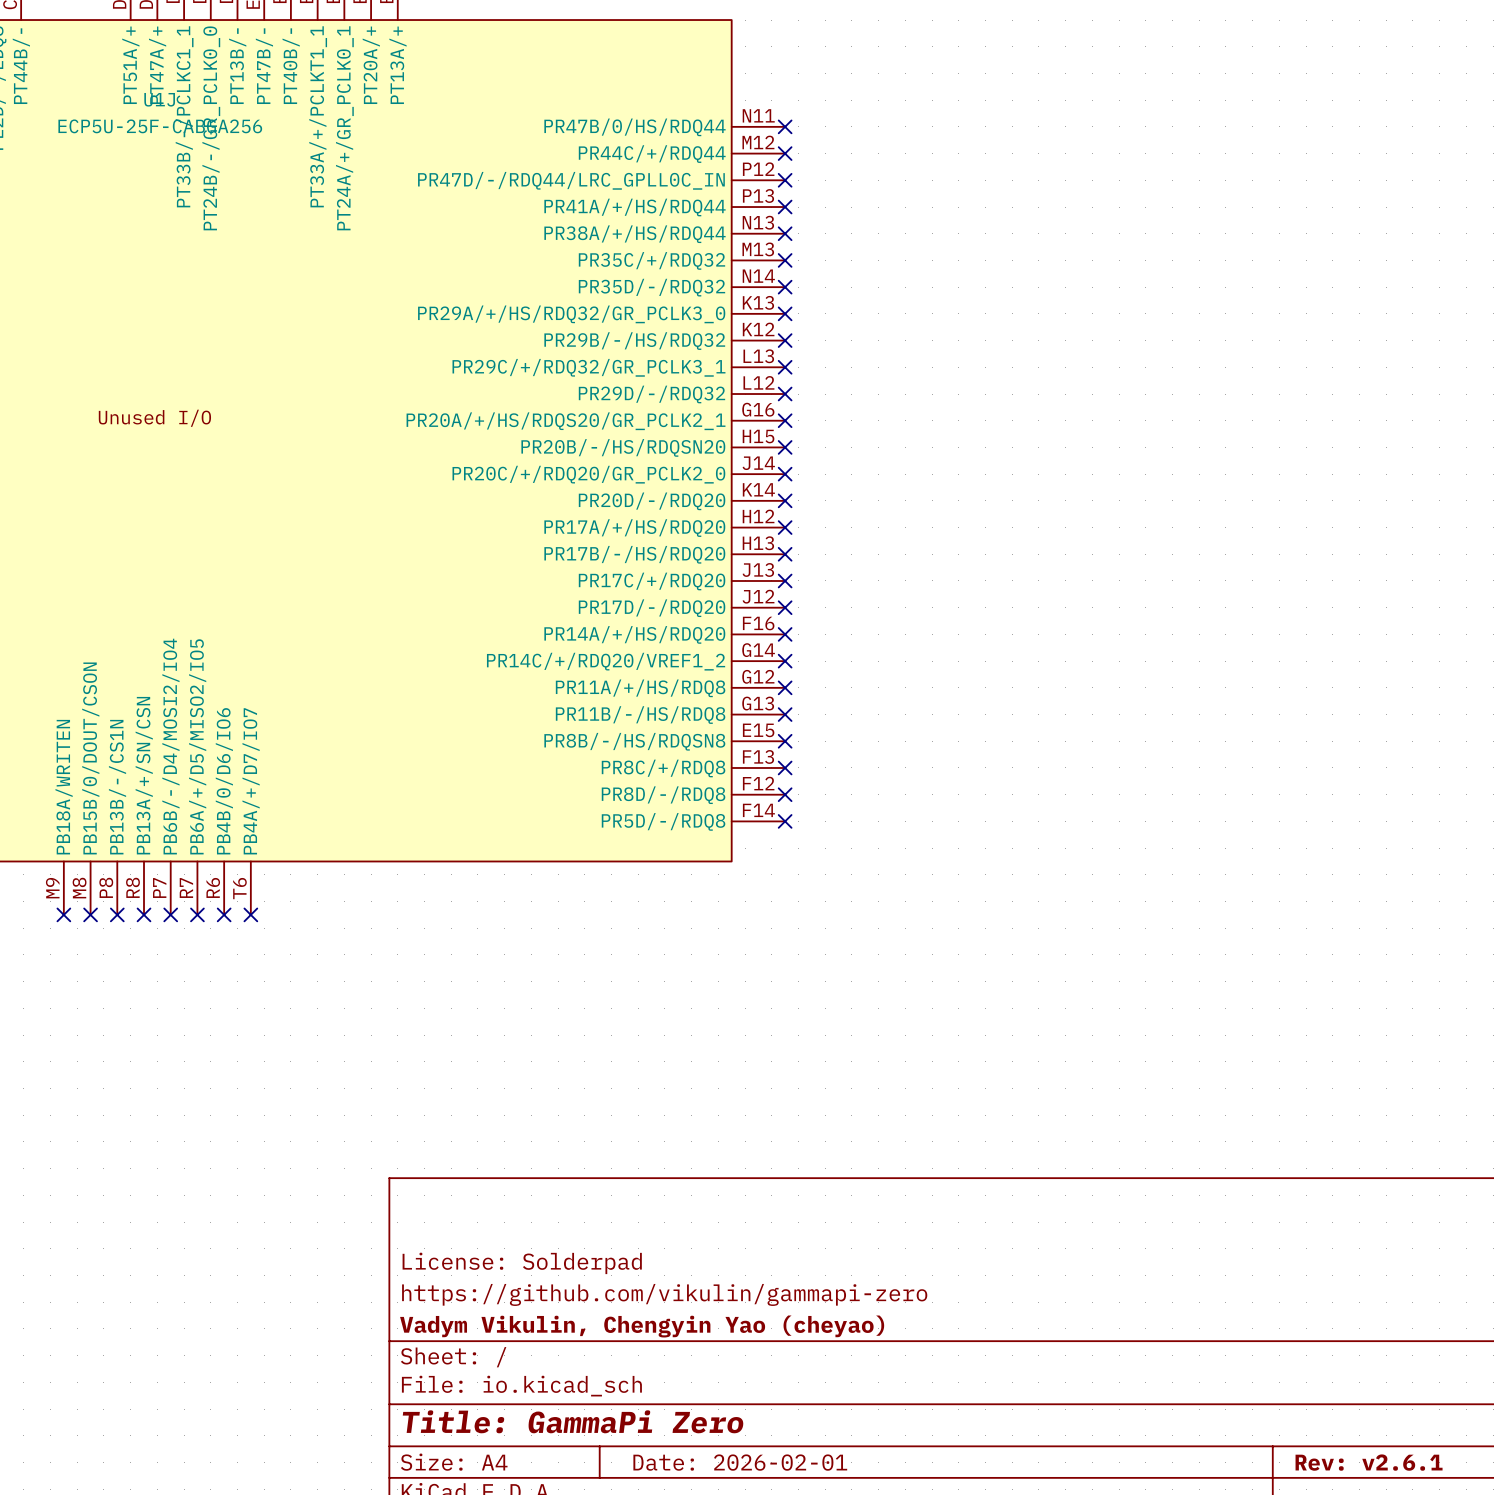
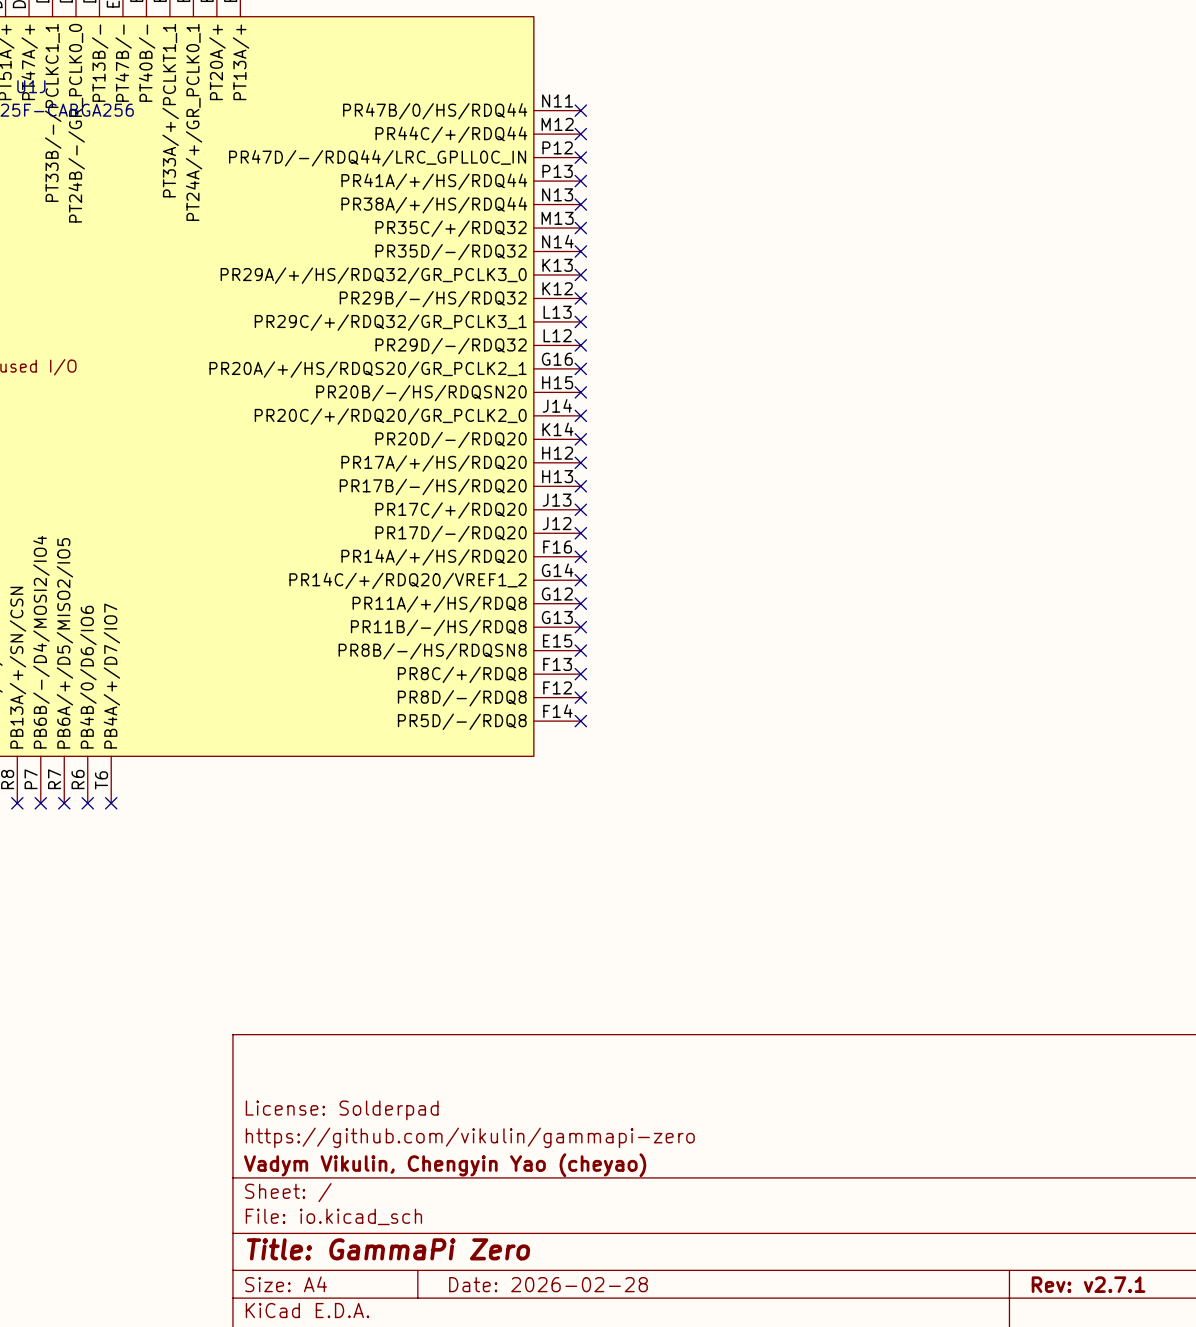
title block: Date: 2026-02-01 (740, 1462) -> Date: 2026-02-28 (548, 1284)
title block: Rev: v2.6.1 (1369, 1462) -> Rev: v2.7.1 (1088, 1284)

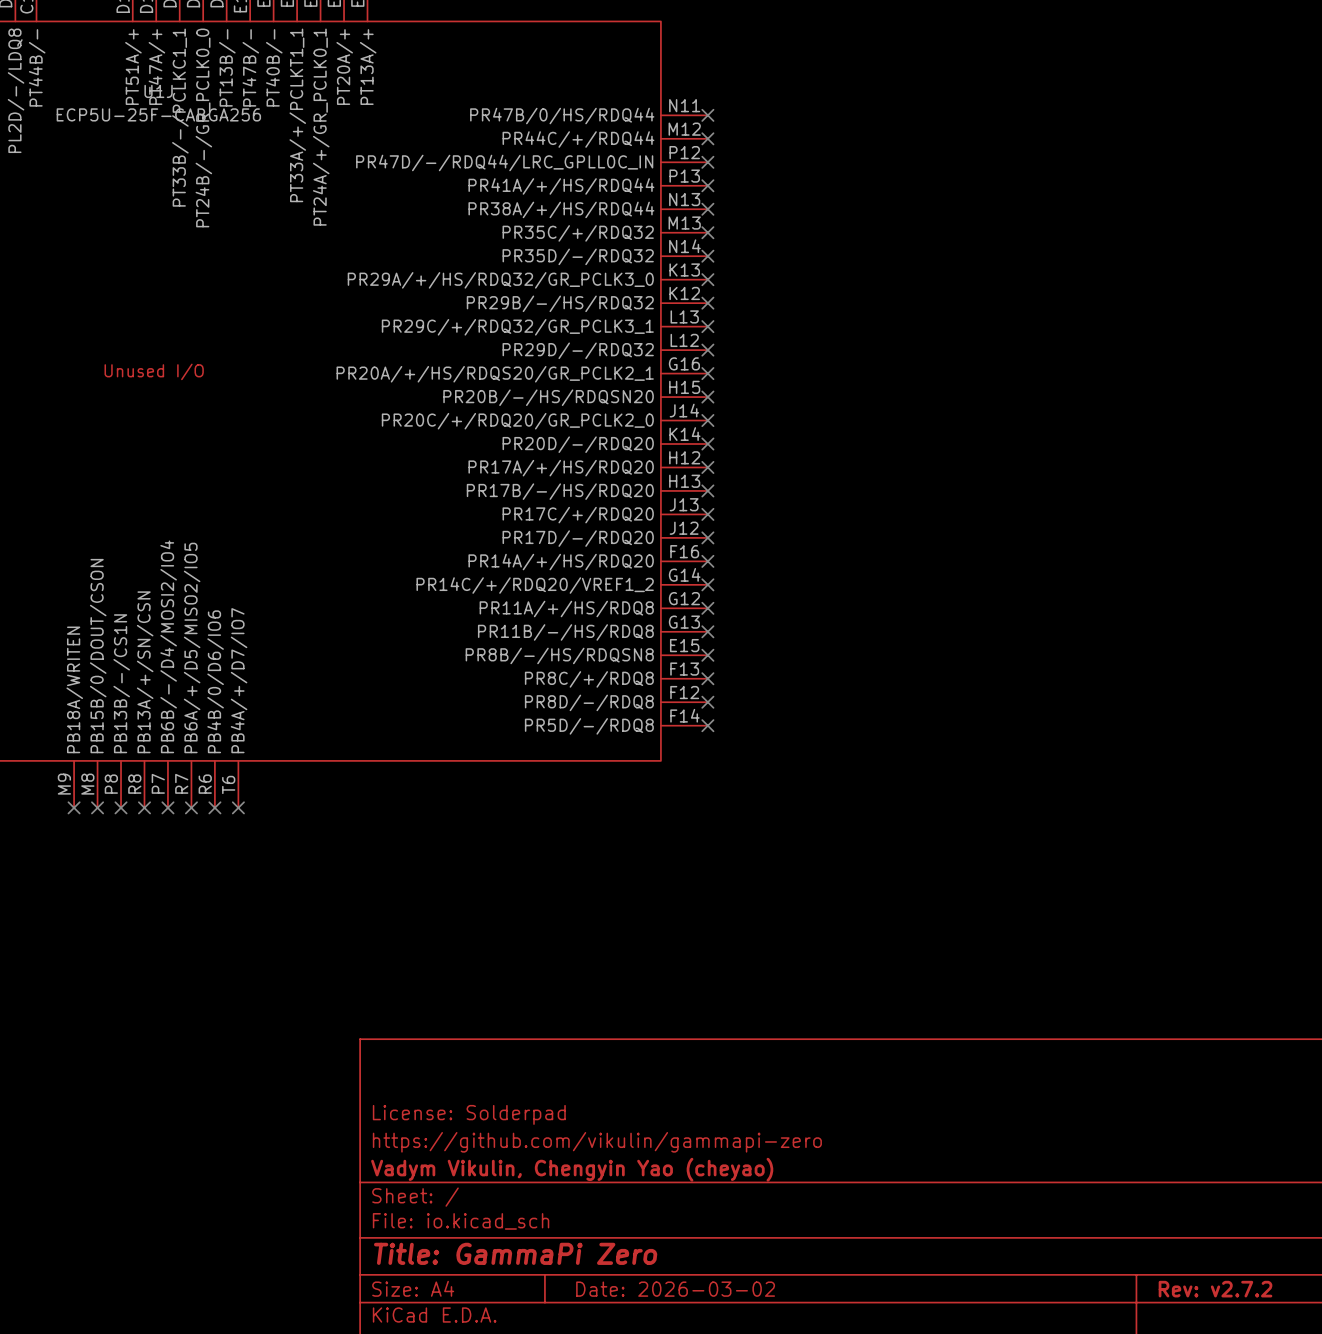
title block: Date: 2026-02-28 (548, 1284) -> Date: 2026-03-02 (675, 1289)
title block: Rev: v2.7.1 (1088, 1284) -> Rev: v2.7.2 (1215, 1289)

